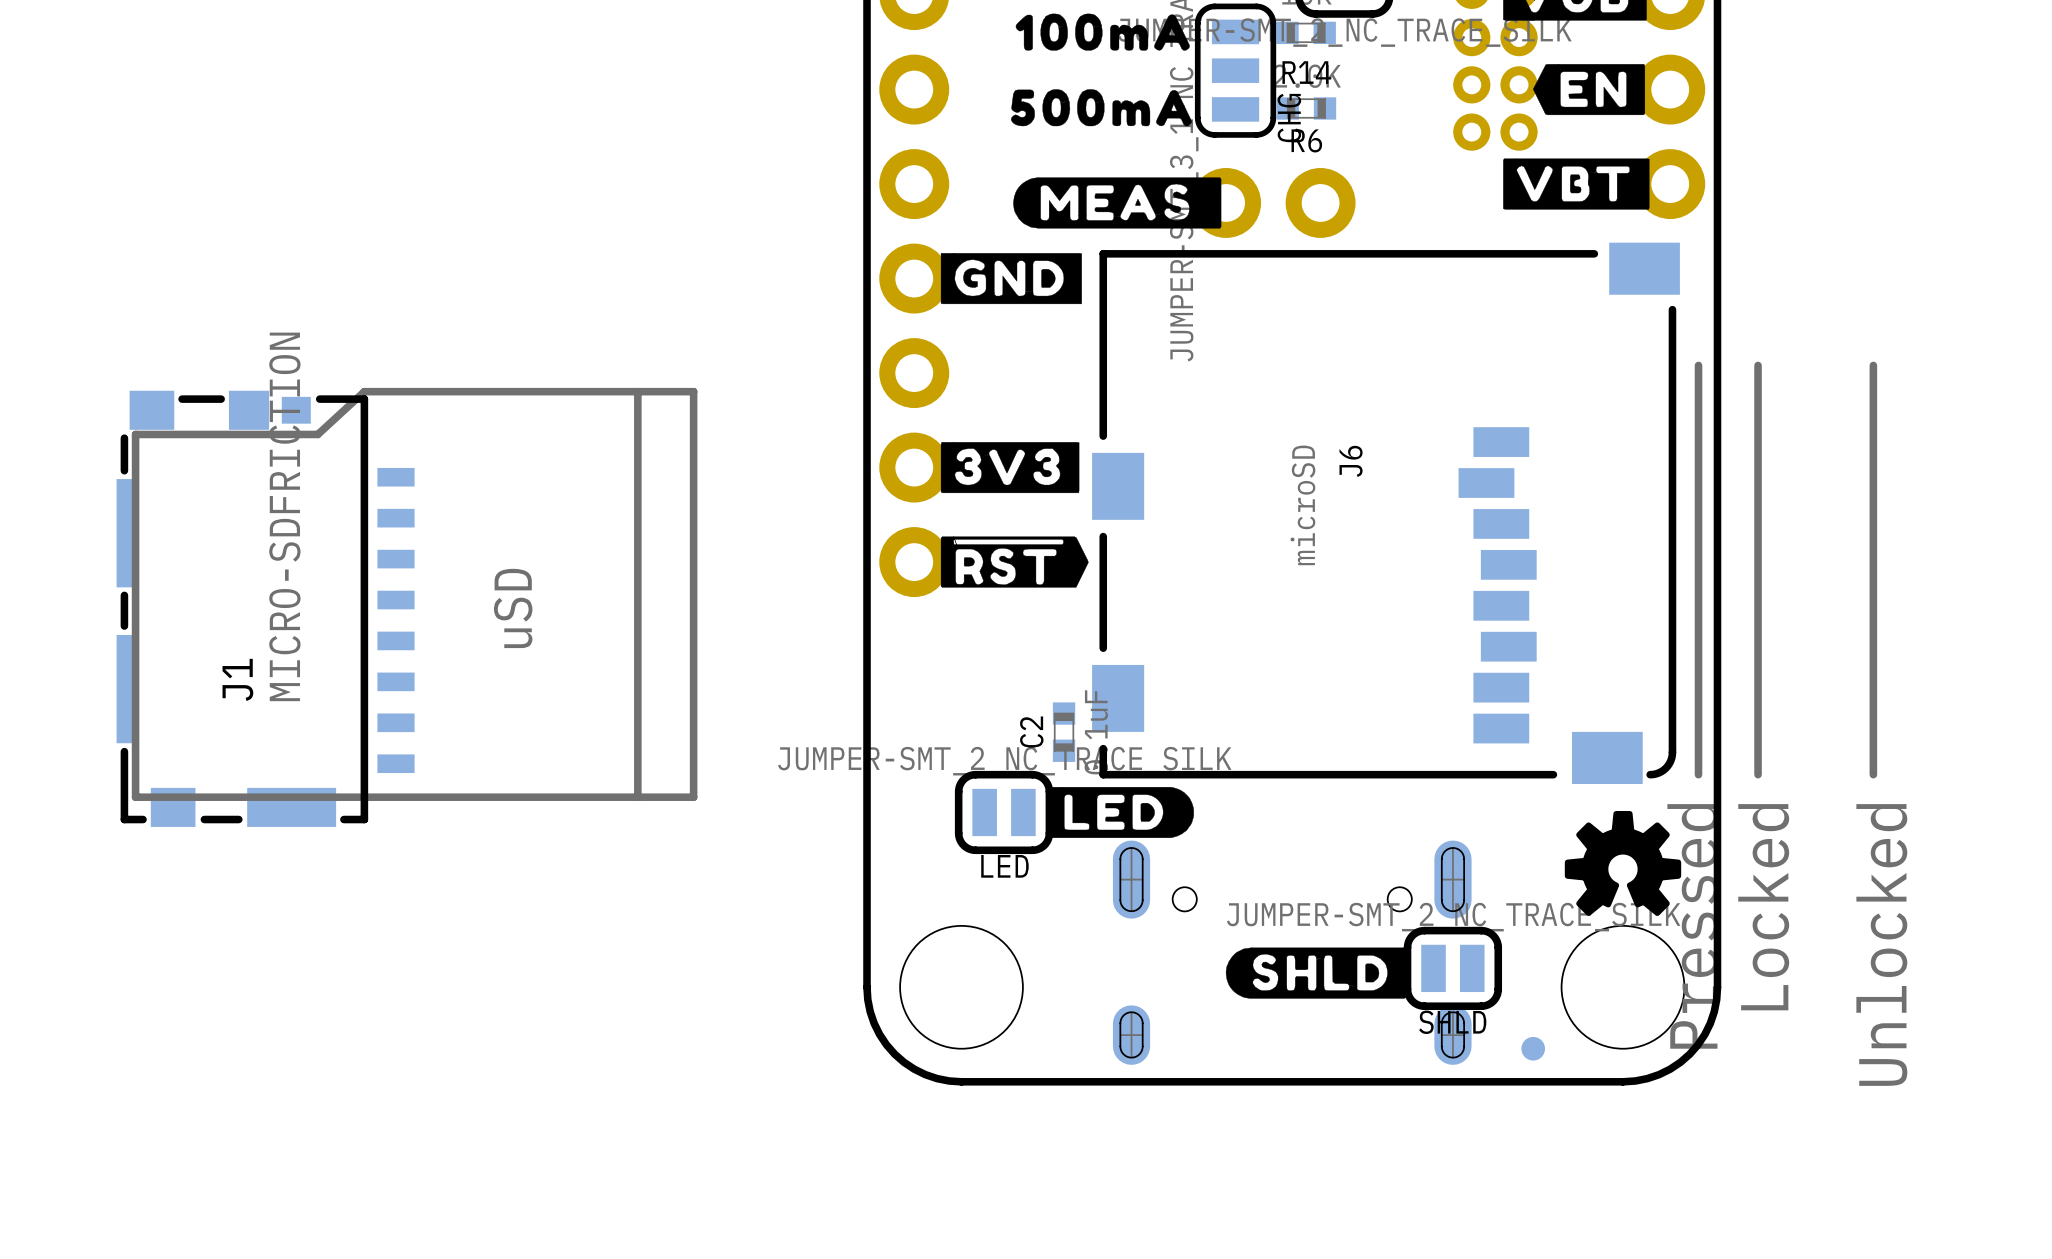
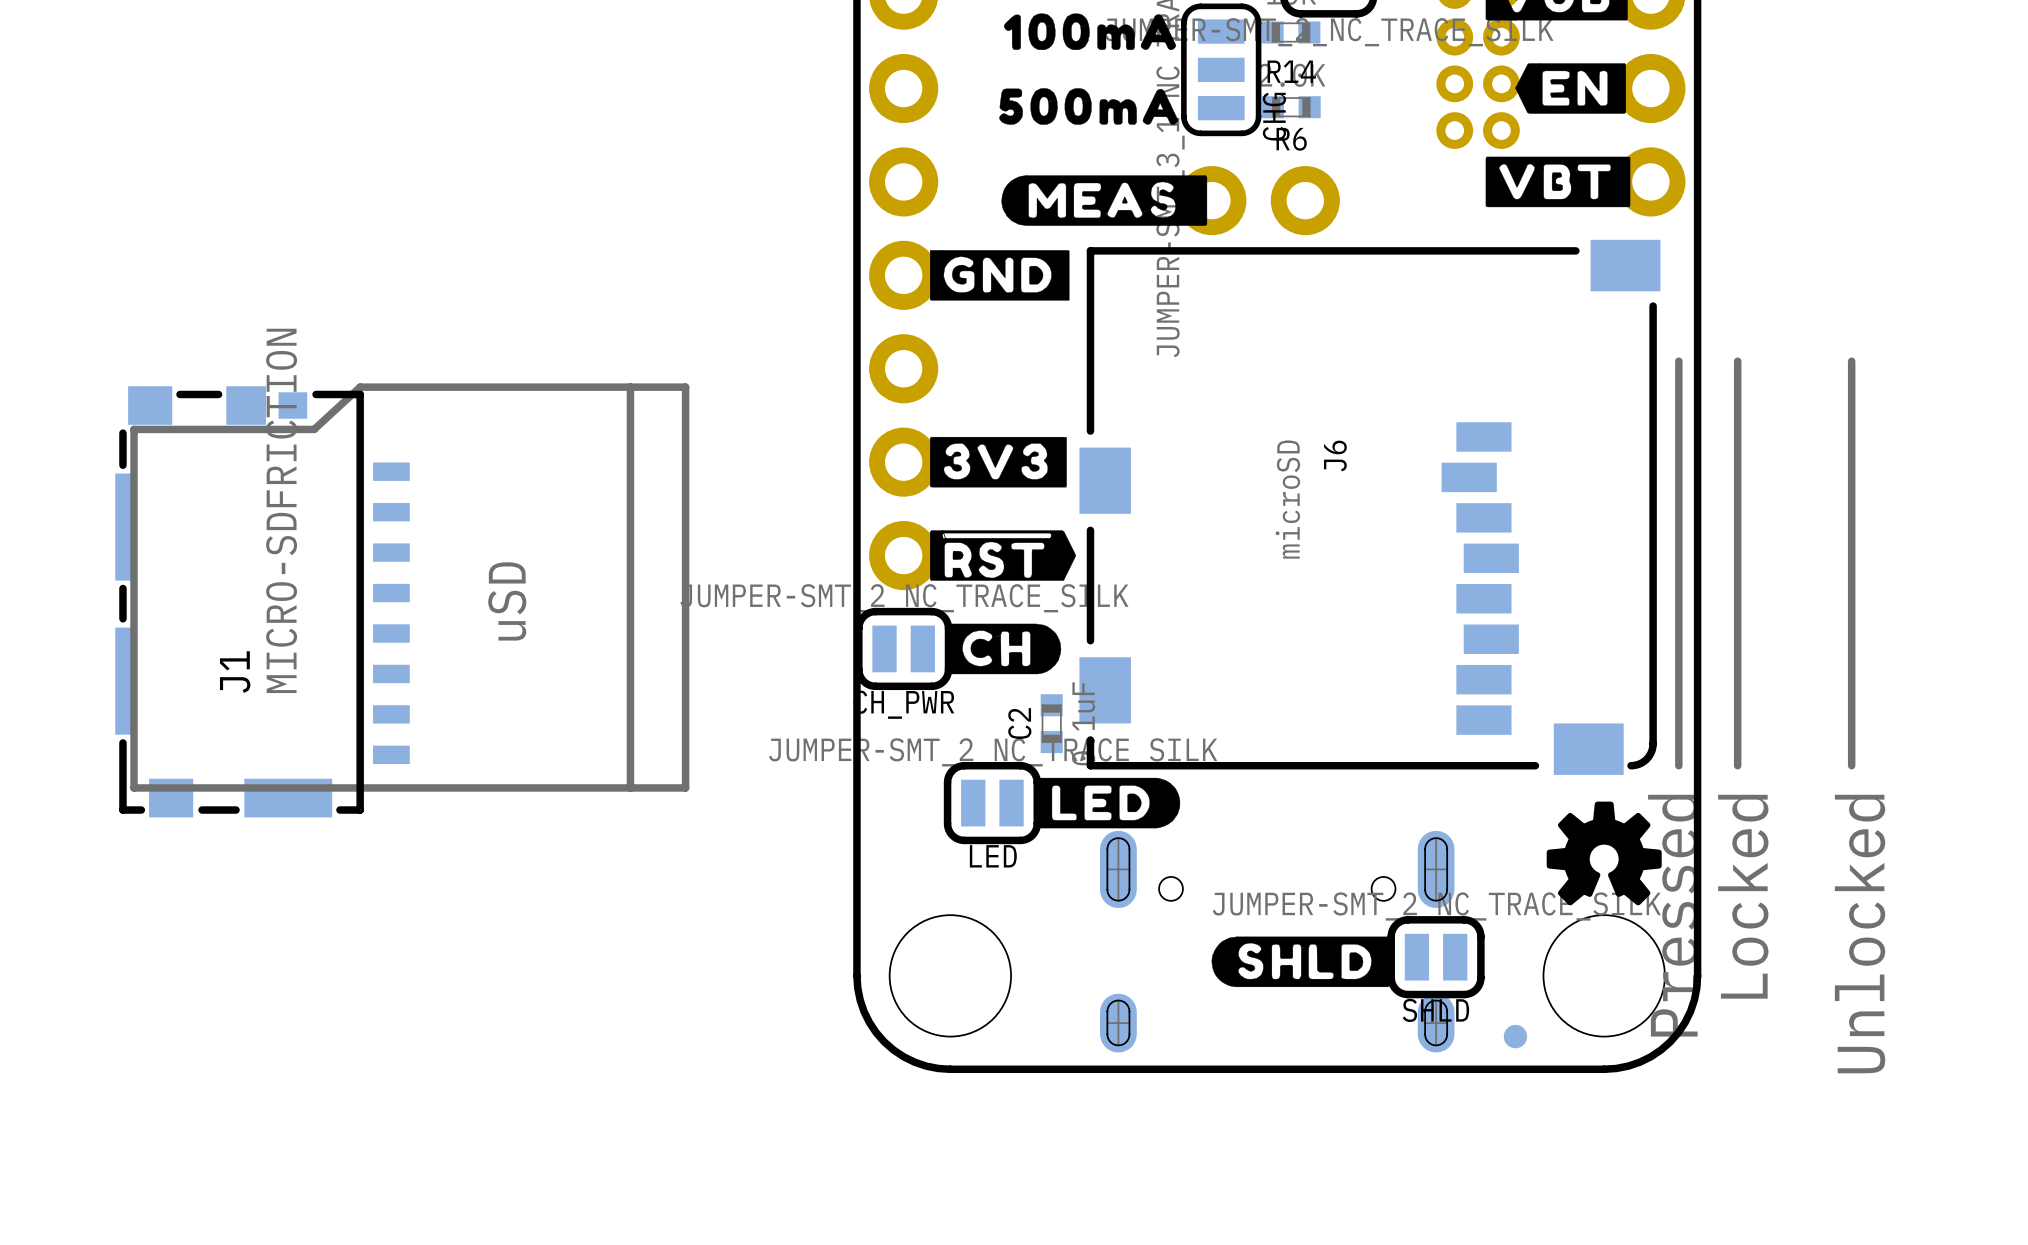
drawing: none -> [948, 623, 1062, 675]
CH_PWR: none -> JUMPER-SMT_2_NC_TRACE_SILK (903, 648)

